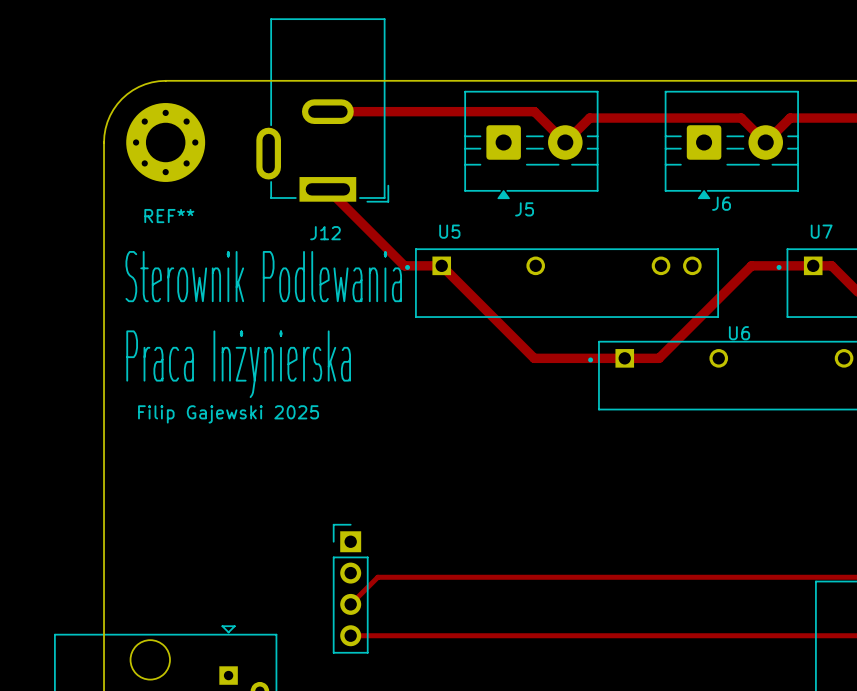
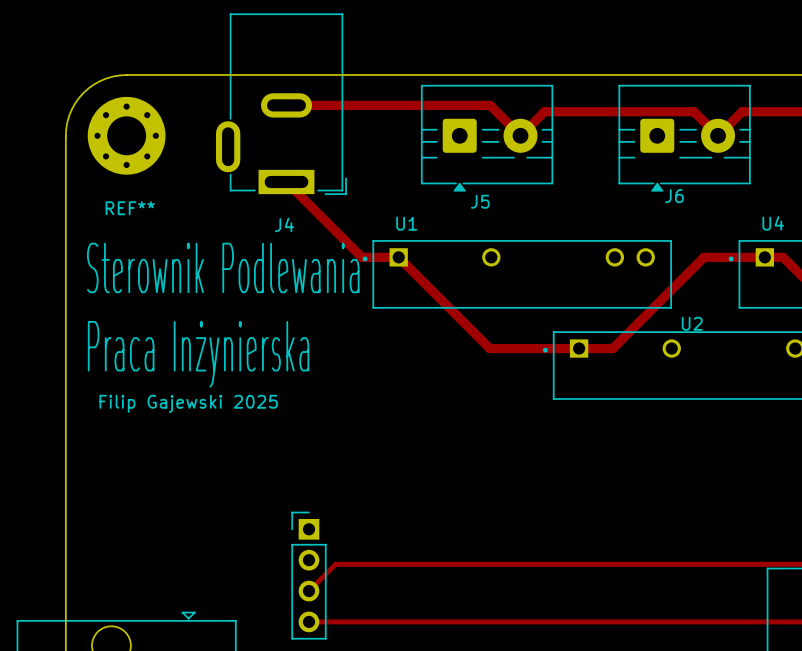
U5 name: U5 (449, 231) -> U1 (406, 223)
U7 name: U7 (821, 231) -> U4 (773, 223)
J12 name: J12 (325, 233) -> J4 (284, 224)
U6 name: U6 (739, 333) -> U2 (692, 323)

